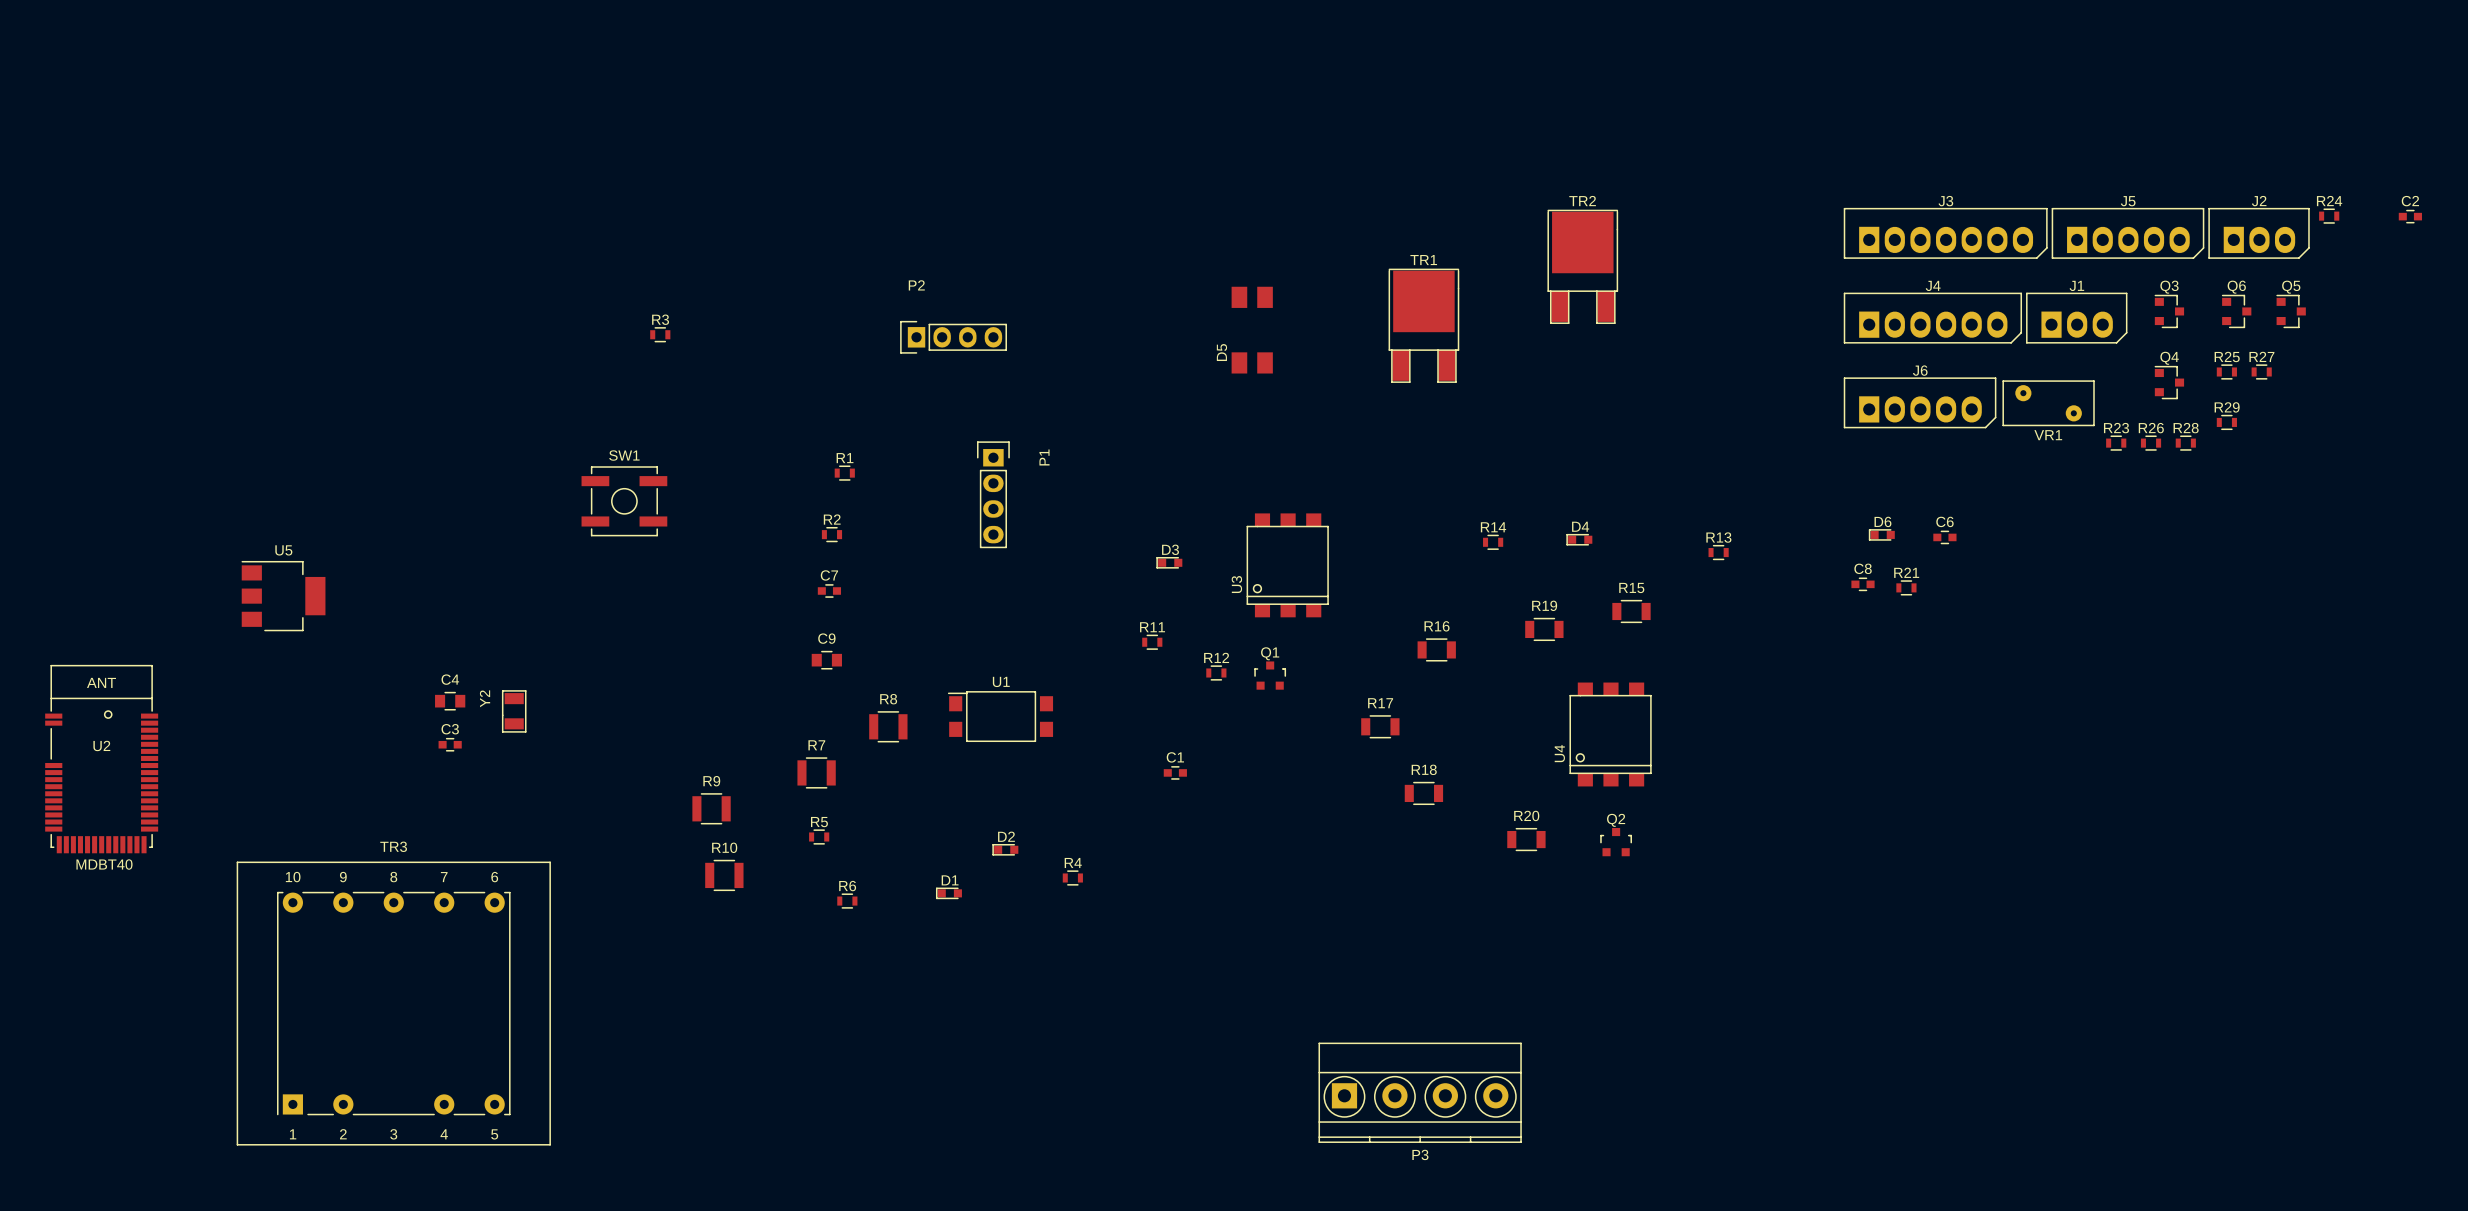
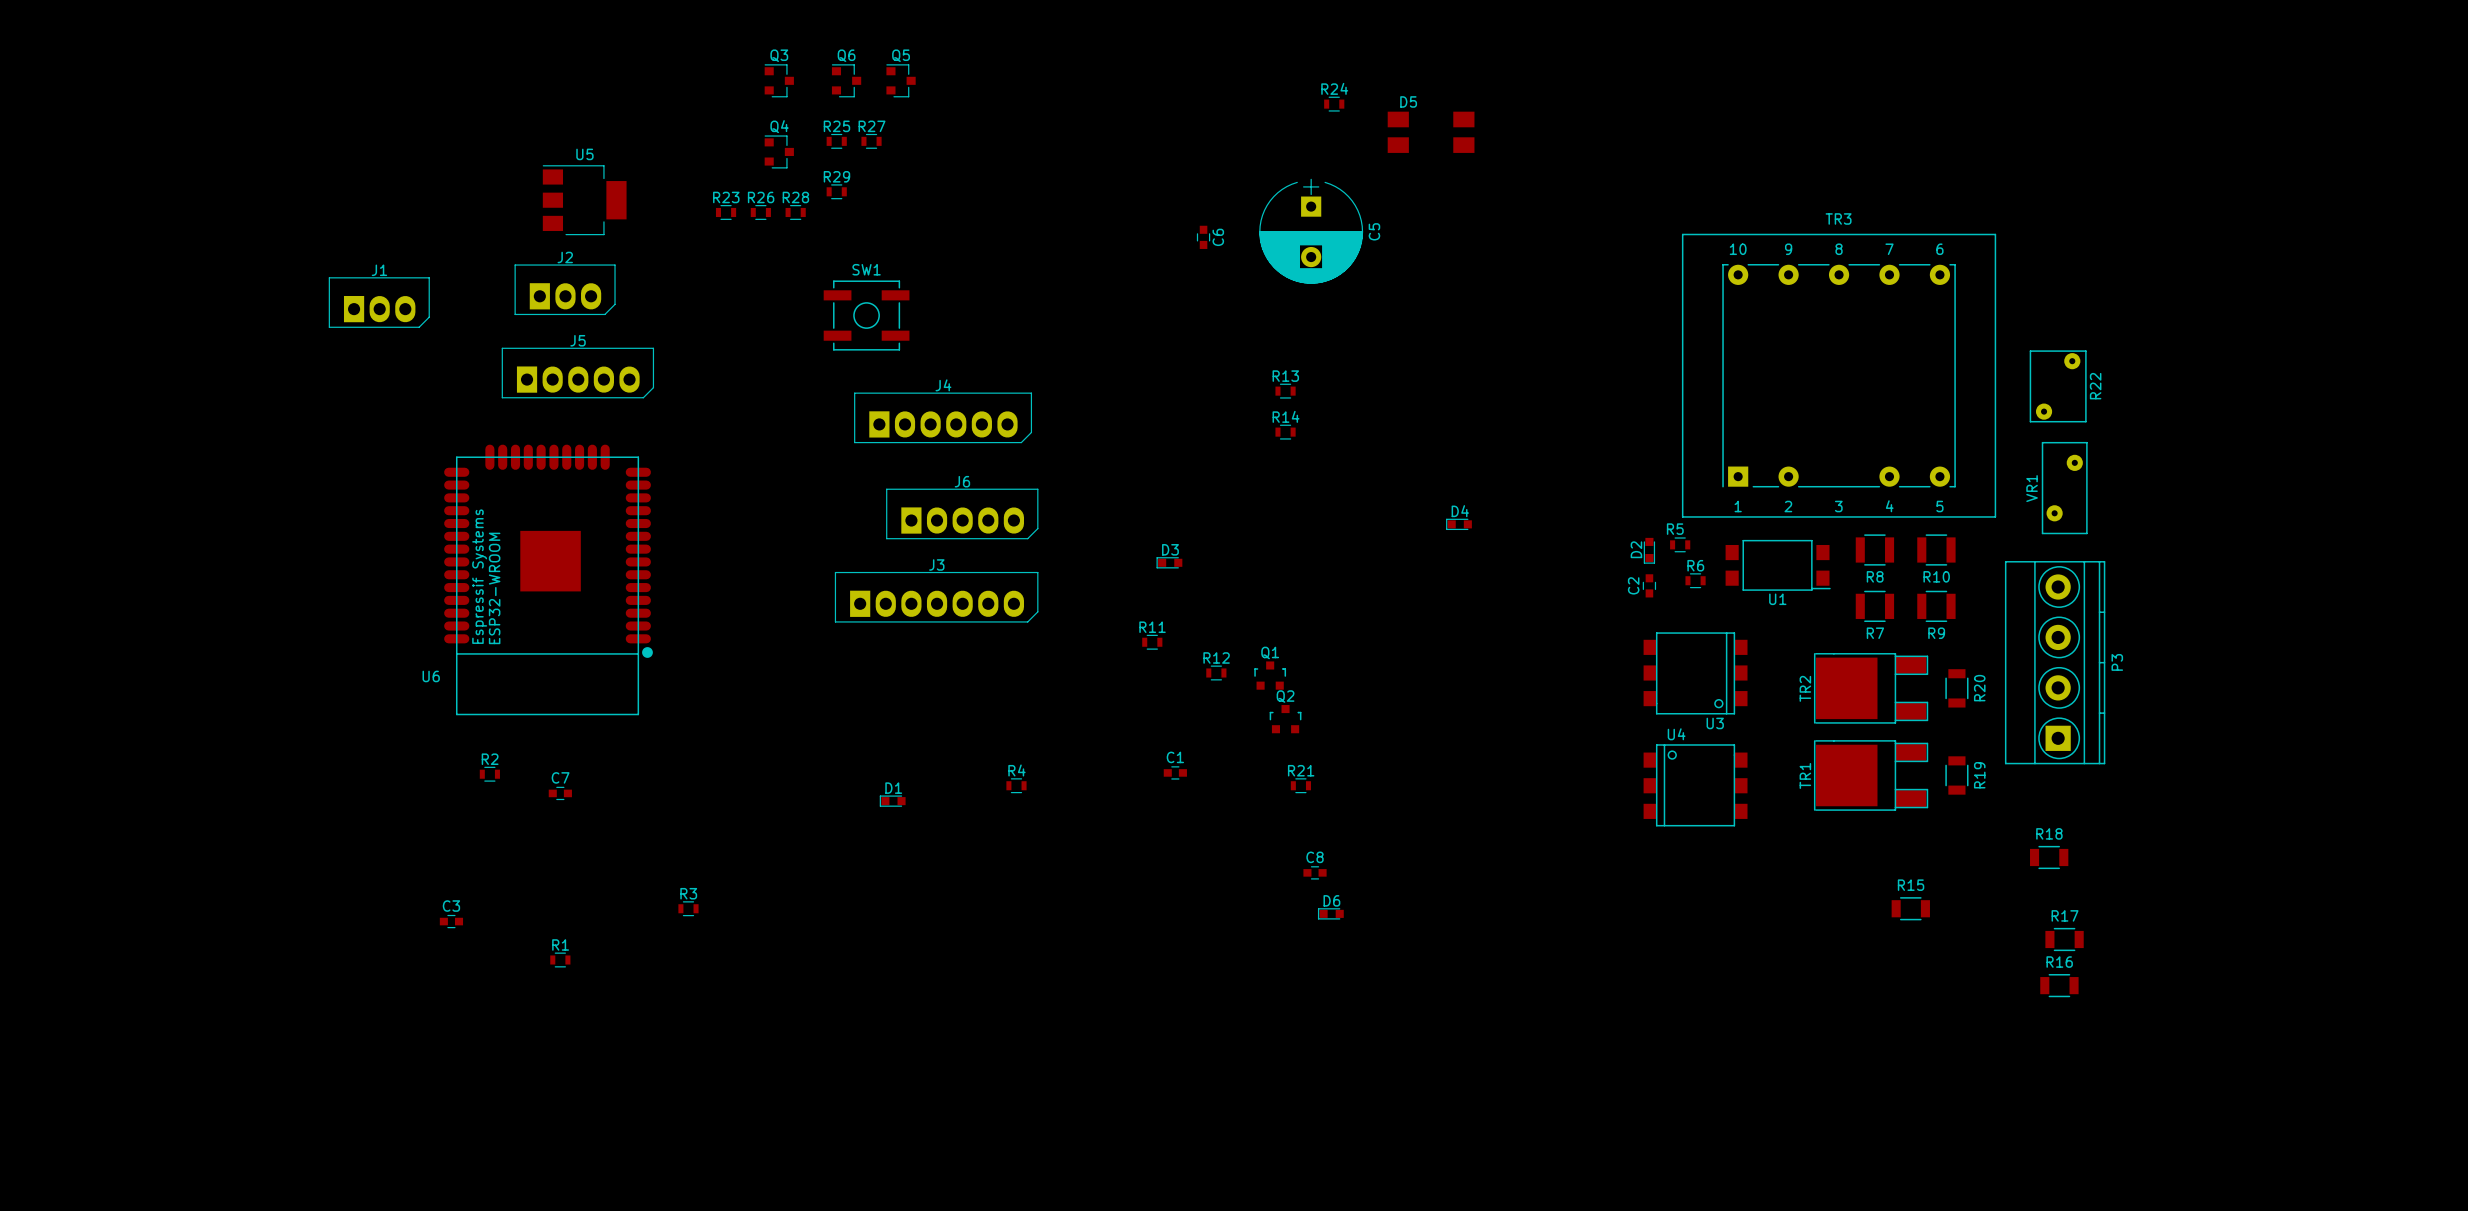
C2 name position: C2 (2410, 201) -> C2 (1633, 585)
R24 position: (2329, 216) -> (1334, 104)
C2 rotation: 0° (2410, 216) -> 90° clockwise (1649, 585)
C2 position: (2410, 216) -> (1649, 585)
C5: none -> (1311, 231)
J3 position: (1945, 233) -> (936, 597)
J5 position: (2127, 233) -> (577, 373)
J2 position: (2259, 233) -> (565, 289)
TR2 rotation: 0° (1582, 266) -> 90° counterclockwise (1871, 688)
TR2 position: (1582, 266) -> (1871, 688)
Q3 position: (2169, 311) -> (779, 80)
Q6 position: (2236, 311) -> (846, 80)
Q5 position: (2291, 311) -> (900, 80)
J4 position: (1932, 318) -> (943, 417)
J1 position: (2076, 318) -> (379, 302)
TR1 rotation: 0° (1423, 325) -> 90° counterclockwise (1871, 775)
TR1 position: (1423, 325) -> (1871, 775)
D5 rotation: 0° (1252, 330) -> 90° clockwise (1431, 132)
D5 position: (1252, 330) -> (1431, 132)
R3 position: (660, 334) -> (688, 908)
P2: (953, 337) -> none
R25 position: (2226, 371) -> (836, 141)
R27 position: (2261, 371) -> (871, 141)
Q4 position: (2169, 382) -> (779, 151)
R22: none -> (2058, 386)
J6 position: (1920, 402) -> (962, 513)
VR1 rotation: 0° (2048, 403) -> 90° clockwise (2064, 488)
VR1 position: (2048, 403) -> (2064, 488)
R29 position: (2226, 422) -> (836, 191)
R23 position: (2116, 443) -> (726, 212)
R26 position: (2151, 443) -> (760, 212)
R28 position: (2185, 443) -> (795, 212)
R1 position: (844, 473) -> (560, 959)
P1: (993, 494) -> none
SW1 position: (624, 501) -> (866, 315)
R2 position: (831, 534) -> (489, 774)
D6 position: (1881, 534) -> (1330, 913)
C6 rotation: 0° (1944, 537) -> 90° clockwise (1203, 237)
C6 position: (1944, 537) -> (1203, 237)
D4 position: (1579, 539) -> (1458, 524)
R14 position: (1493, 542) -> (1285, 432)
R13 position: (1718, 552) -> (1285, 391)
U3 rotation: 0° (1287, 565) -> 90° counterclockwise (1695, 673)
U3 position: (1287, 565) -> (1695, 673)
U6: none -> (548, 579)
C8 position: (1862, 584) -> (1315, 872)
R21 position: (1906, 587) -> (1300, 785)
C7 position: (829, 590) -> (560, 793)
U5 position: (283, 596) -> (584, 200)
R15 position: (1631, 611) -> (1910, 908)
R19 rotation: 0° (1544, 629) -> 90° clockwise (1956, 775)
R19 position: (1544, 629) -> (1956, 775)
R16 position: (1436, 649) -> (2059, 985)
C9: (826, 660) -> none
R8 name position: R8 (888, 699) -> R8 (1875, 576)
C4: (450, 701) -> none
Y2: (514, 711) -> none
U1 rotation: 0° (1000, 716) -> 180° (1778, 565)
U1 position: (1000, 716) -> (1778, 565)
R8 position: (888, 726) -> (1874, 549)
R17 position: (1380, 726) -> (2064, 939)
U4 rotation: 0° (1610, 734) -> 90° clockwise (1695, 785)
U4 position: (1610, 734) -> (1695, 785)
C3 position: (450, 744) -> (451, 921)
R7 name position: R7 (816, 745) -> R7 (1875, 633)
U2: MDBT40 (101, 759) -> none
R7 position: (816, 772) -> (1874, 606)
R9 name position: R9 (711, 781) -> R9 (1936, 633)
R18 position: (1423, 793) -> (2049, 857)
R9 position: (711, 808) -> (1936, 606)
R5 name position: R5 (819, 822) -> R5 (1675, 529)
R5 position: (819, 836) -> (1680, 544)
R20 rotation: 0° (1526, 839) -> 90° clockwise (1956, 688)
R20 position: (1526, 839) -> (1956, 688)
Q2 position: (1616, 842) -> (1285, 719)
R10 name position: R10 (724, 847) -> R10 (1936, 576)
D2 rotation: 0° (1005, 849) -> 90° counterclockwise (1649, 550)
D2 position: (1005, 849) -> (1649, 550)
R10 position: (724, 875) -> (1936, 549)
R4 position: (1072, 877) -> (1016, 785)
D1 position: (949, 893) -> (892, 801)
R6 position: (847, 901) -> (1695, 580)
TR3 position: (393, 1003) -> (1839, 375)
P3 rotation: 0° (1420, 1092) -> 90° counterclockwise (2055, 662)
P3 position: (1420, 1092) -> (2055, 662)

